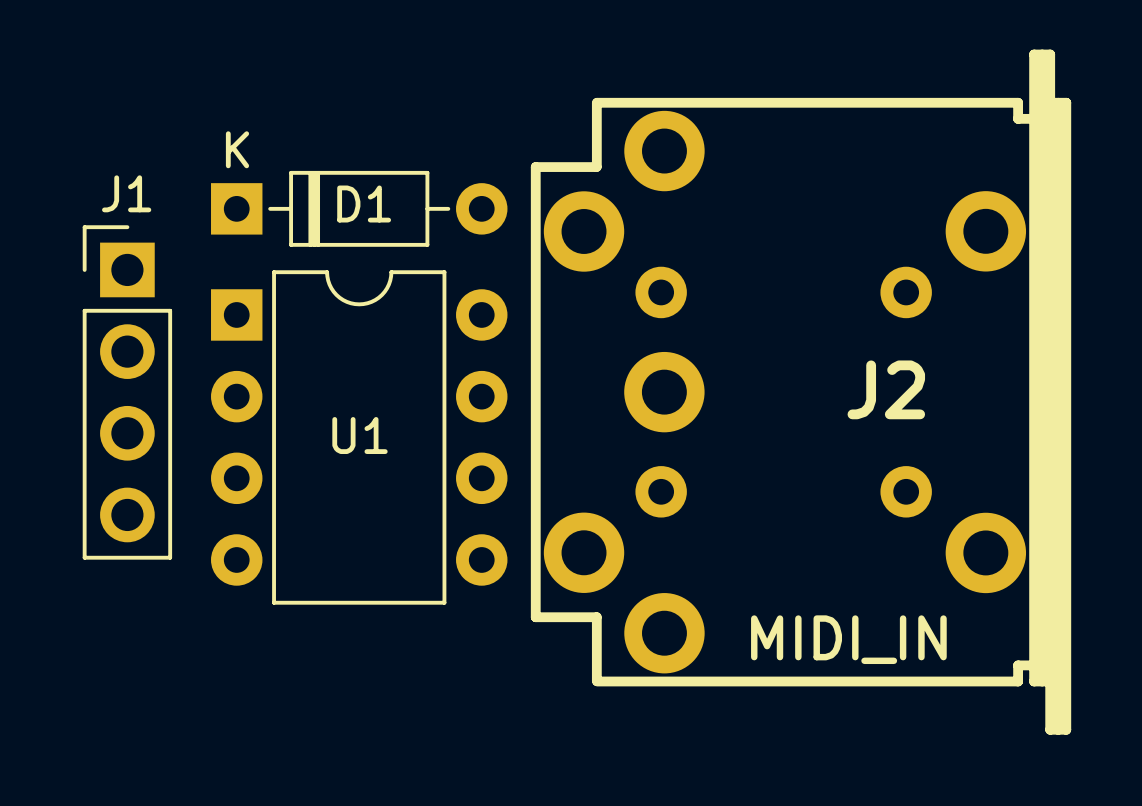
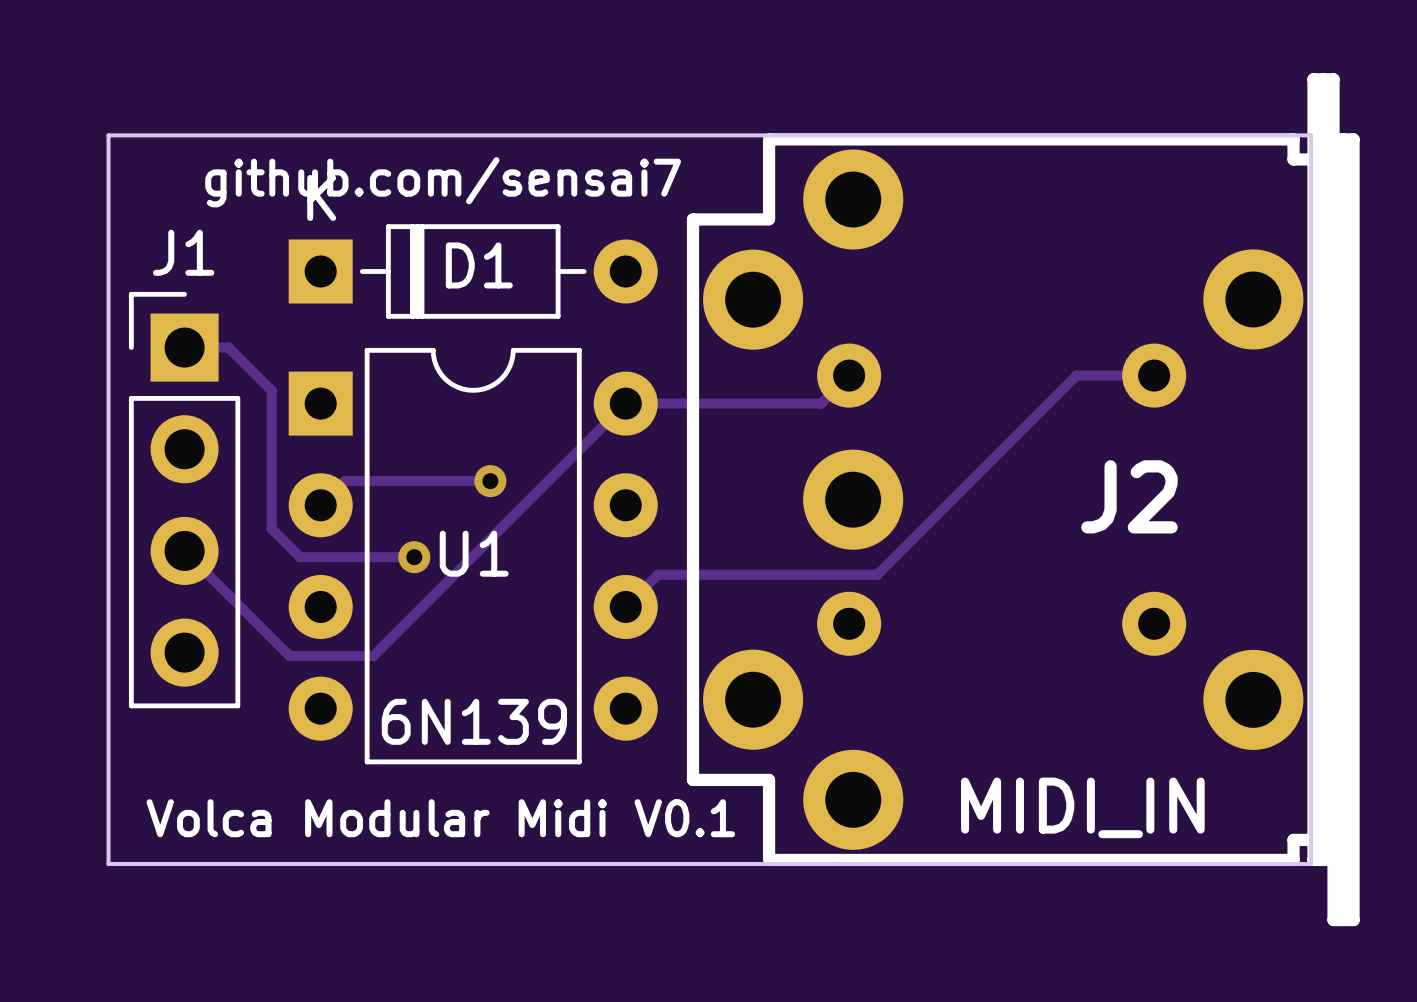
board edge: none -> (108, 135) (108, 863) (1311, 863) (1311, 135) (108, 135)
text: none -> github.com/sensai7 (443, 182)
track: none -> (184, 347) (228, 347) (271, 390) (271, 528) (300, 557) (414, 557)
track: none -> (849, 375) (821, 403) (625, 403) (373, 656) (289, 656) (184, 550)
track: none -> (1154, 375) (1076, 375) (877, 574) (657, 574) (625, 606)
track: none -> (490, 481) (344, 481) (320, 505)
via: none -> (490, 481)
via: none -> (414, 557)
U1 value: none -> 6N139 (474, 721)
text: none -> Volca Modular Midi V0.1 (440, 818)

